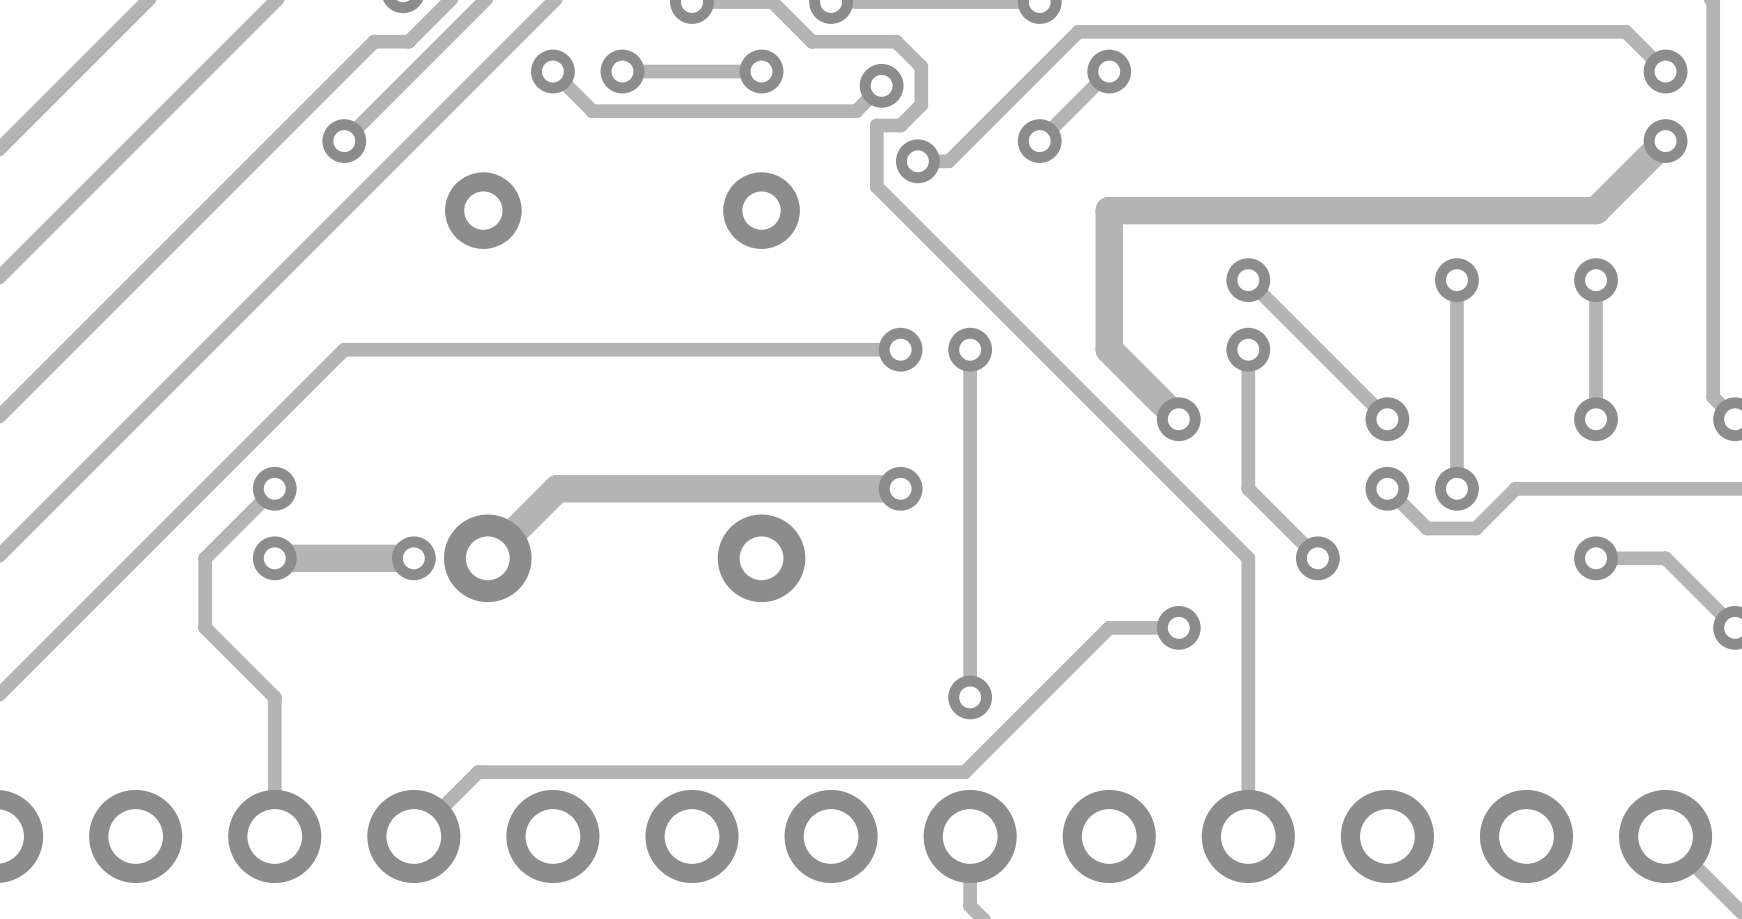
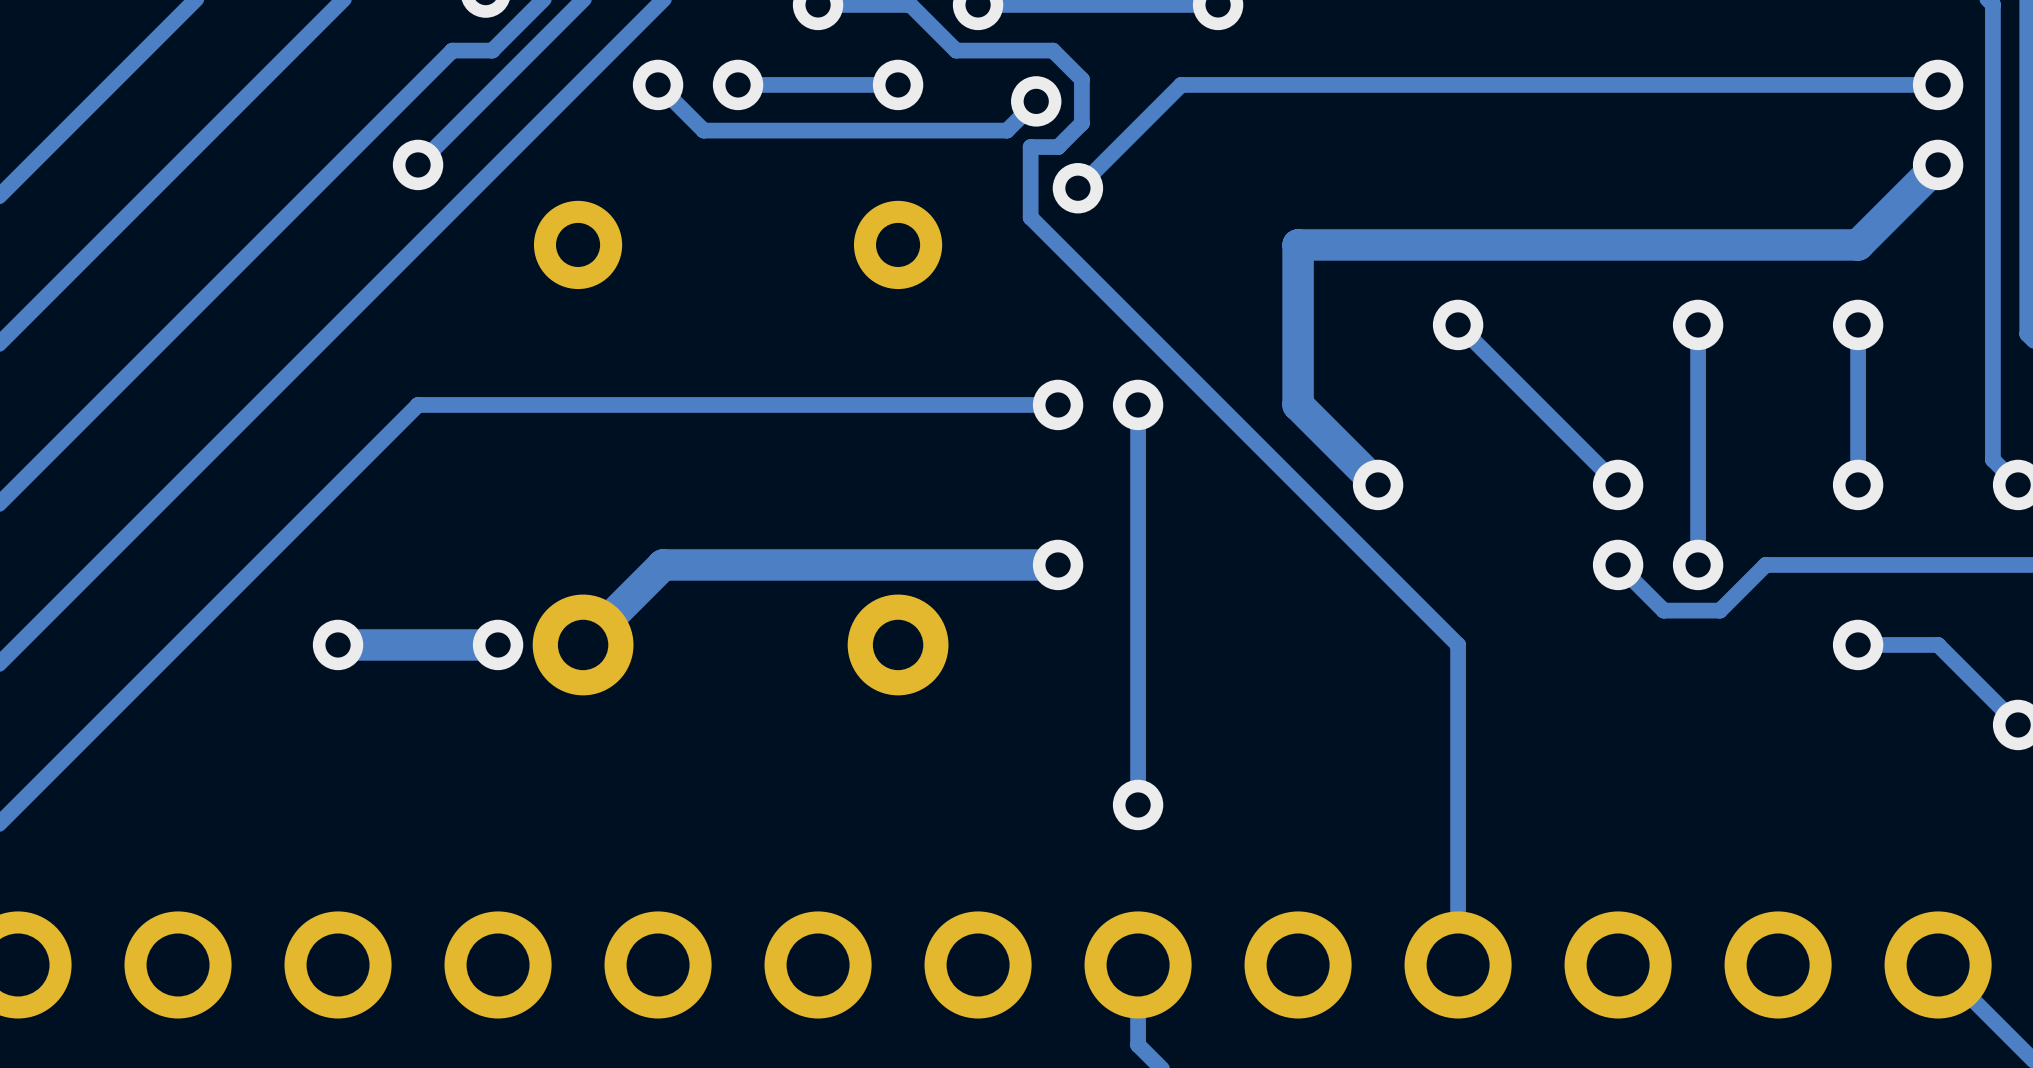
track: (1109, 71) (1039, 141) -> none
via: (1109, 71) -> none
track: (1665, 71) (1625, 31) (1078, 31) (948, 161) (917, 161) -> (1938, 84) (1181, 84) (1077, 188)
via: (1039, 141) -> none
track: (1248, 349) (1248, 488) (1317, 558) -> none
via: (1248, 349) -> none
track: (274, 488) (205, 558) (205, 627) (274, 697) (274, 836) -> none
via: (274, 488) -> none
via: (1317, 558) -> none
track: (1178, 627) (1109, 627) (964, 772) (478, 772) (413, 836) -> none
via: (1178, 627) -> none

